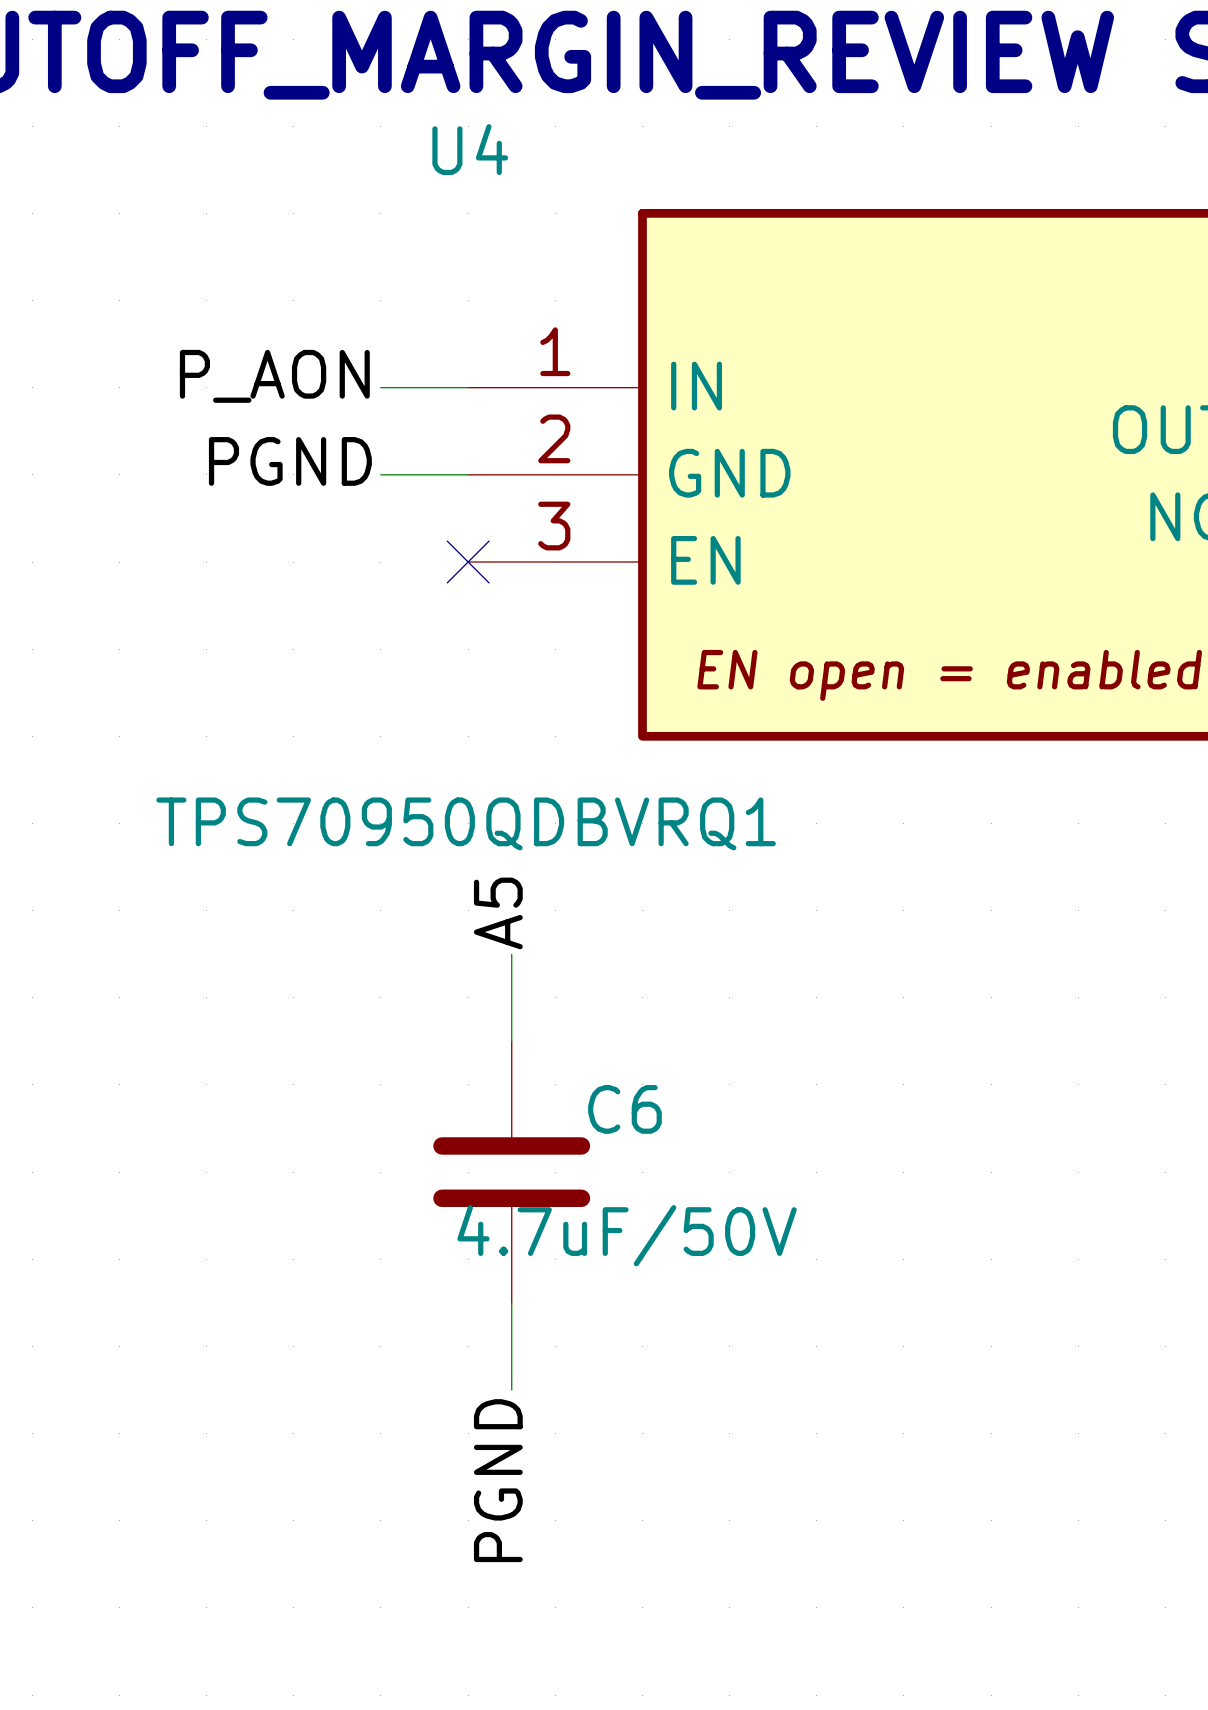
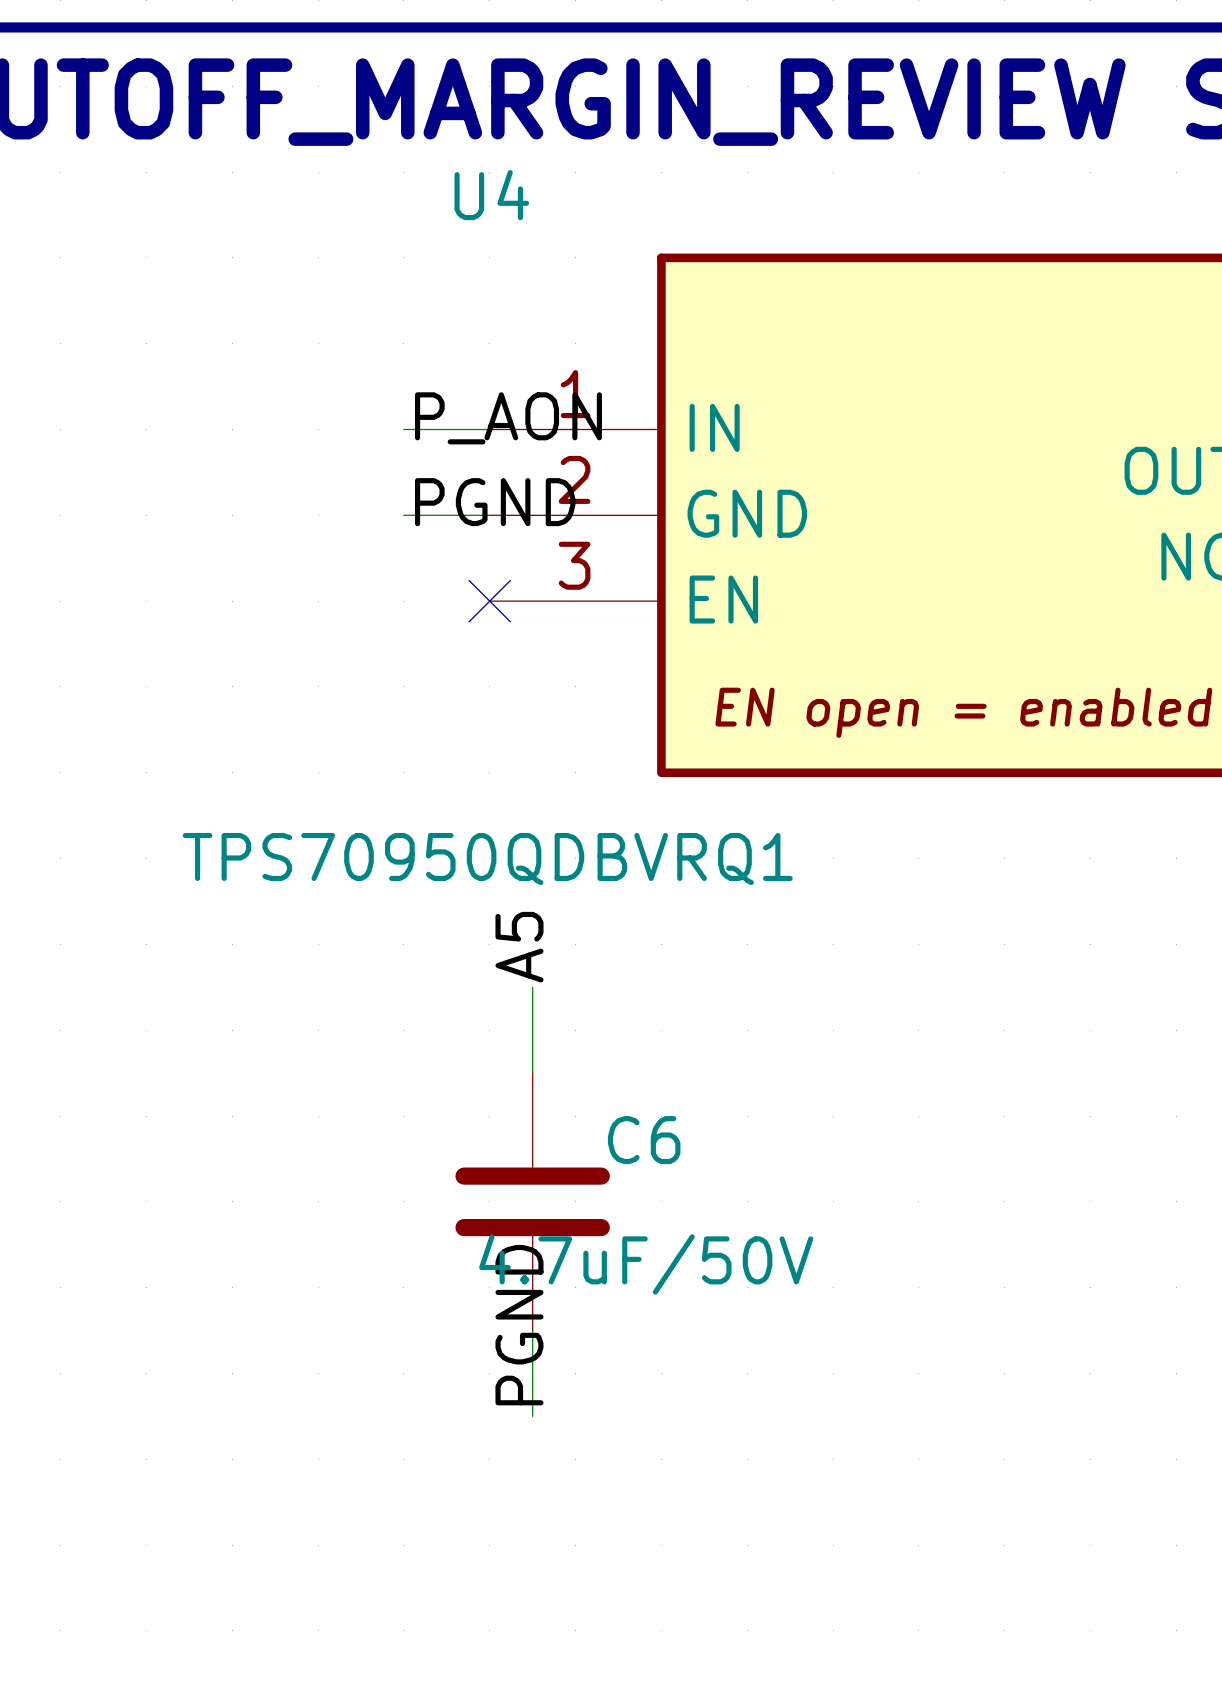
label position: P_AON (274, 376) -> P_AON (508, 418)
label position: PGND (290, 461) -> PGND (495, 502)
label position: PGND (498, 1480) -> PGND (519, 1325)

